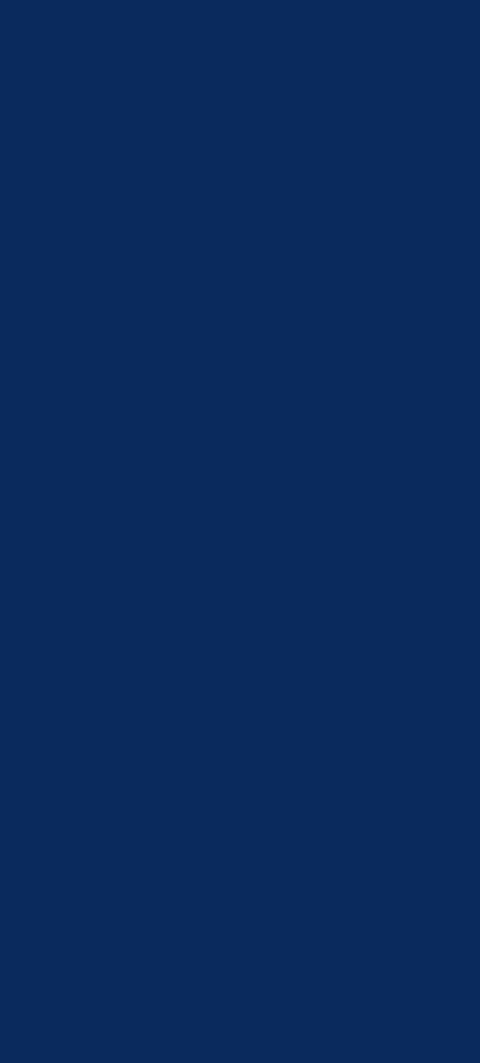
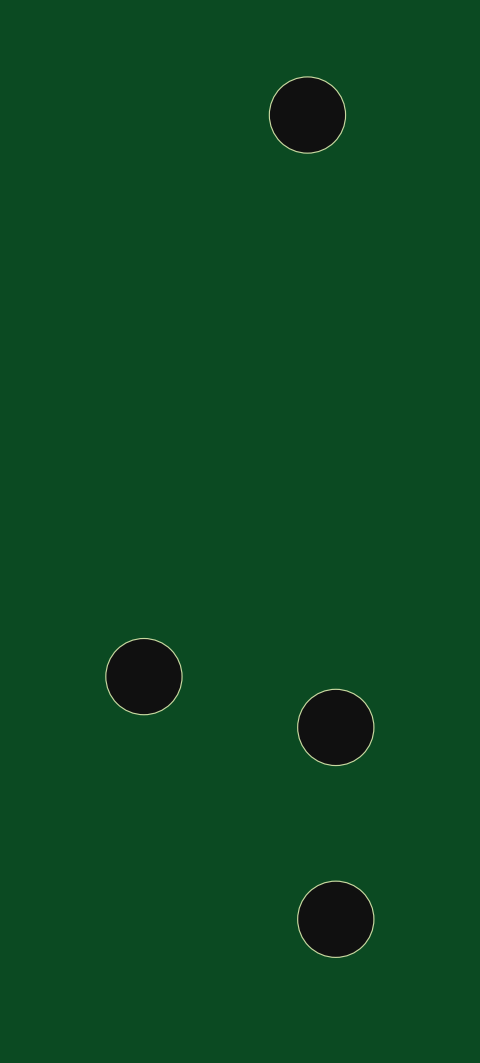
part: none -> (307, 115)
part: none -> (143, 676)
part: none -> (335, 727)
part: none -> (335, 919)

